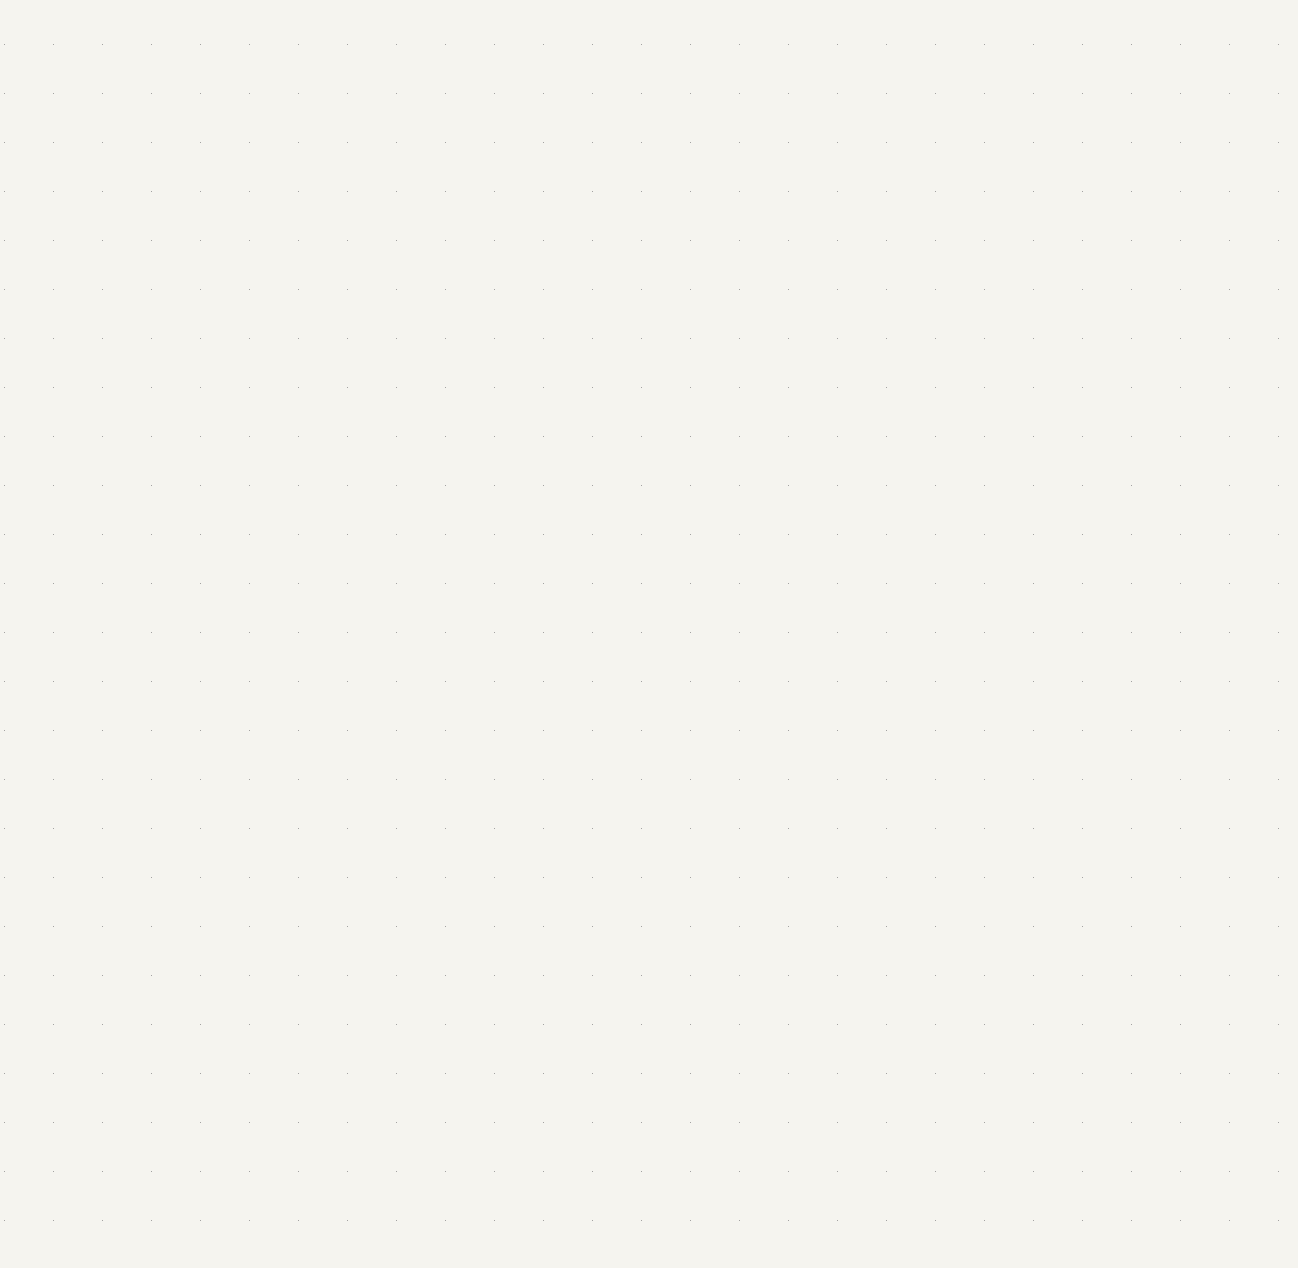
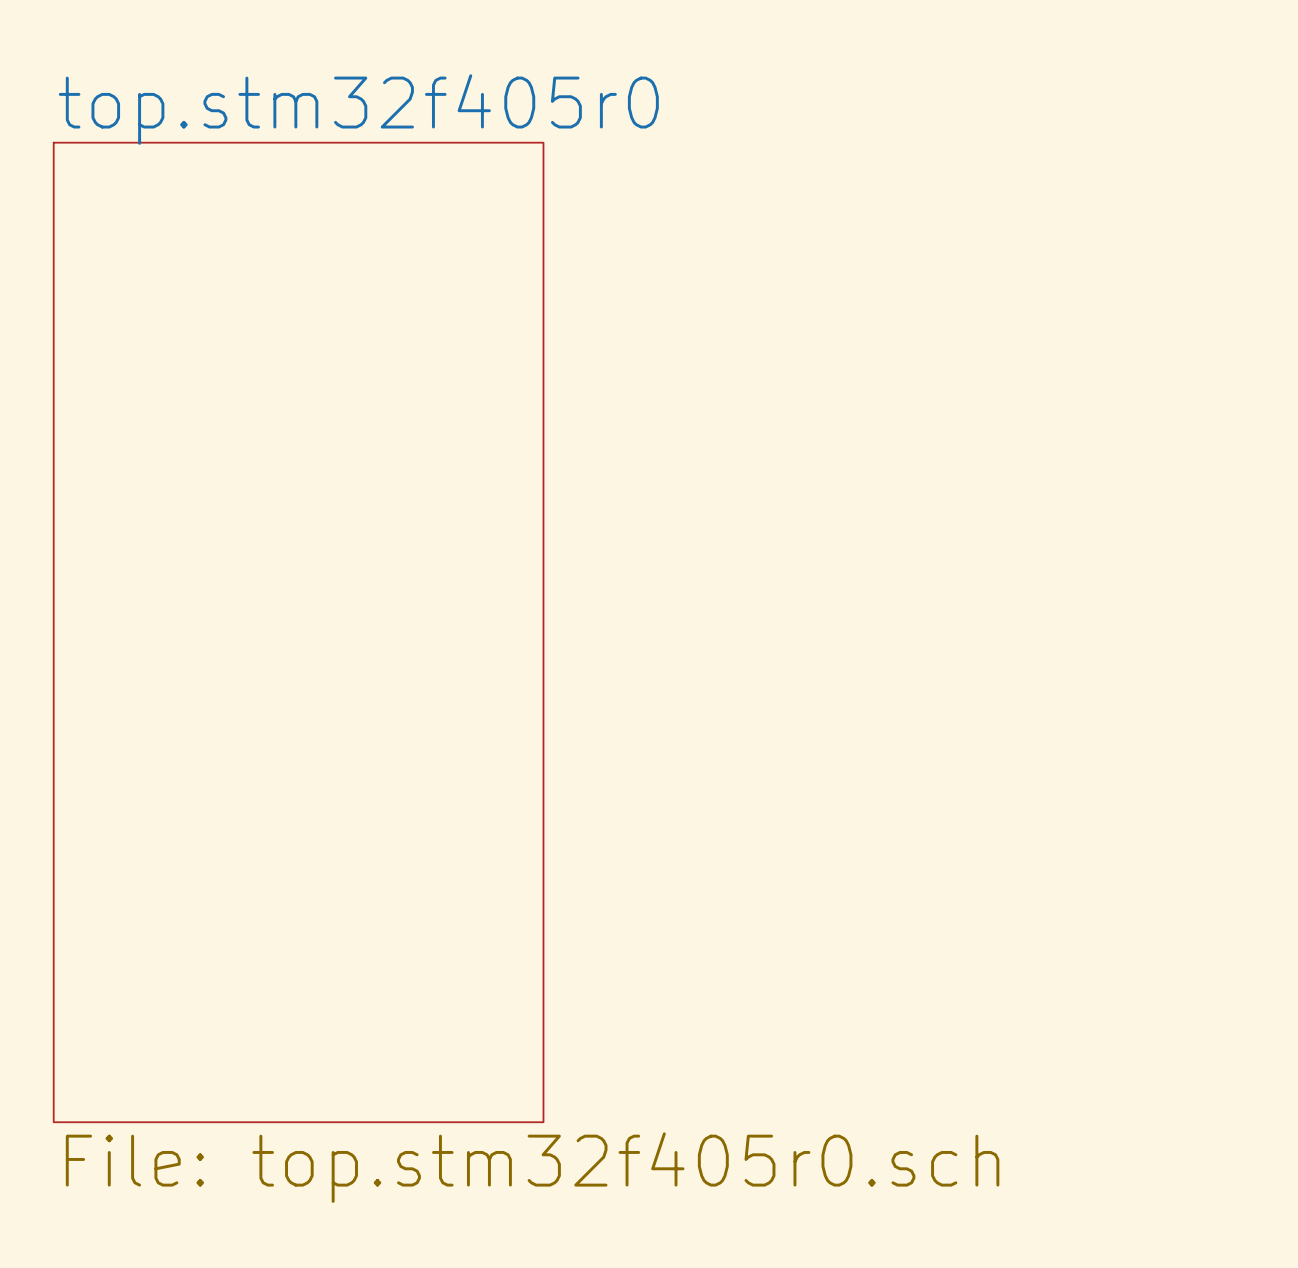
sheet top.stm32f405r0: none -> File: top.stm32f405r0.sch (298, 632)

